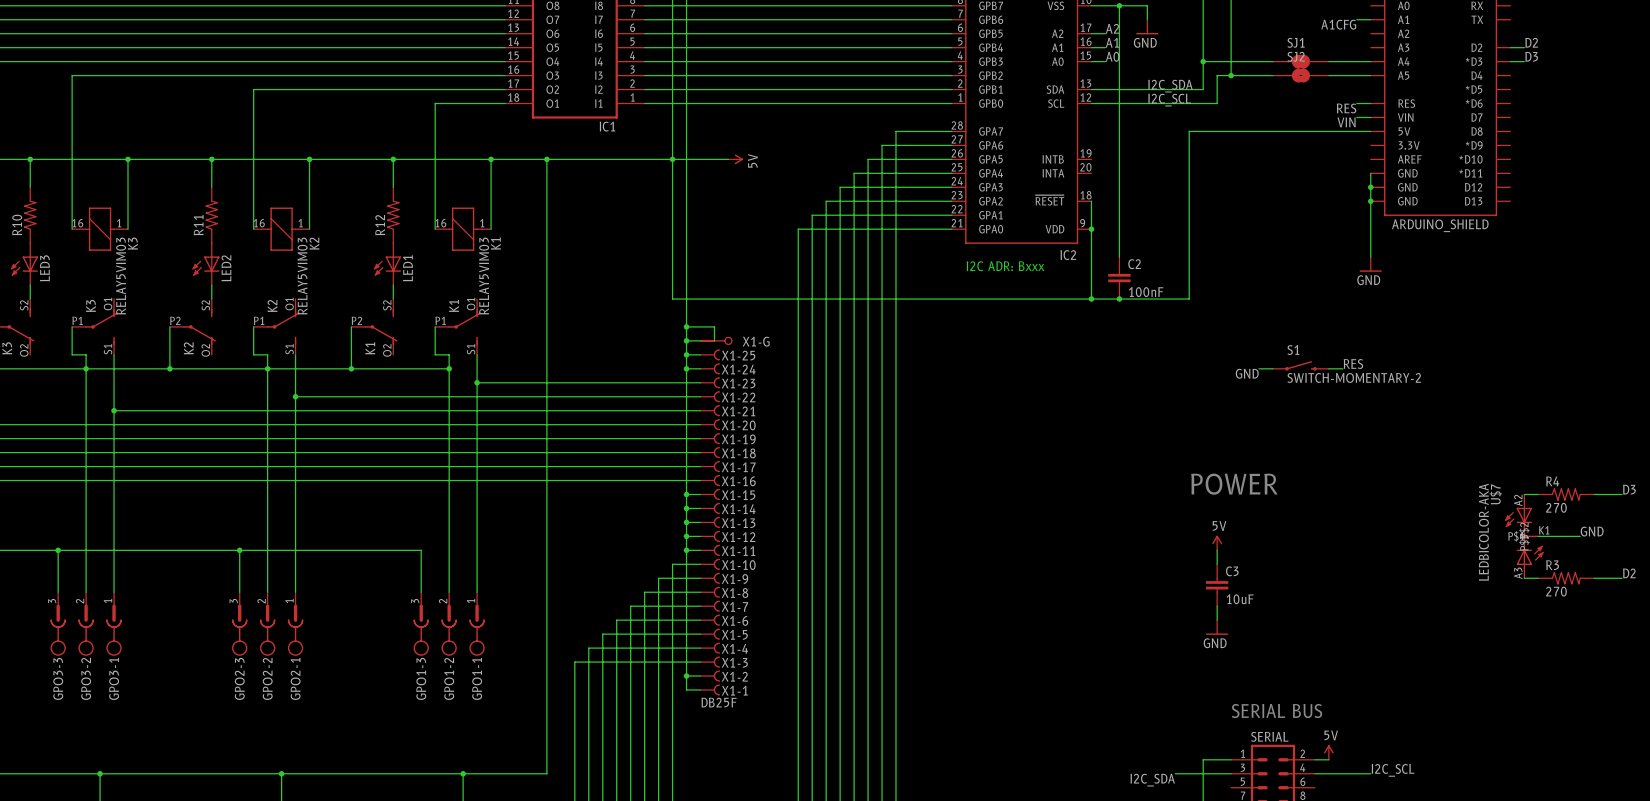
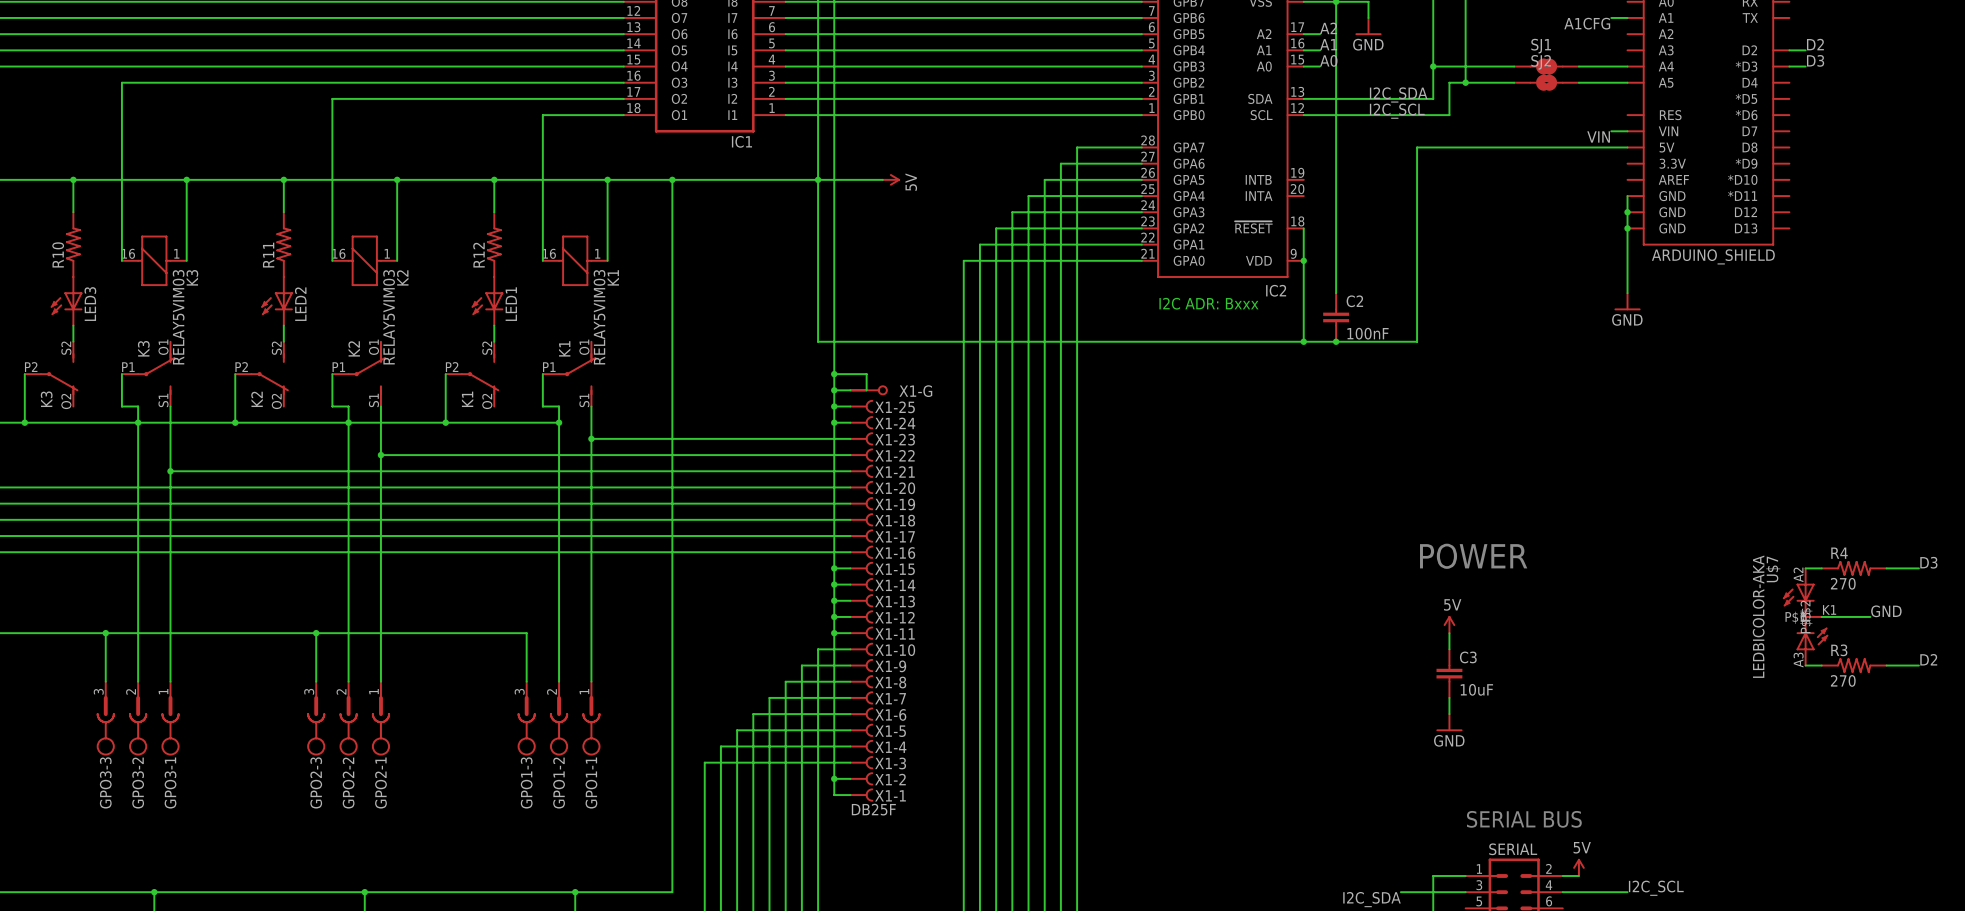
wire: (1356, 103) (1370, 103) -> none
label: RES (1346, 108) -> none
label: RES (1353, 364) -> none
S1: SWITCH-MOMENTARY-2 (1300, 365) -> none
wire: (1259, 368) (1273, 368) -> none
wire: (1328, 368) (1342, 368) -> none
label: GND (1247, 373) -> none

